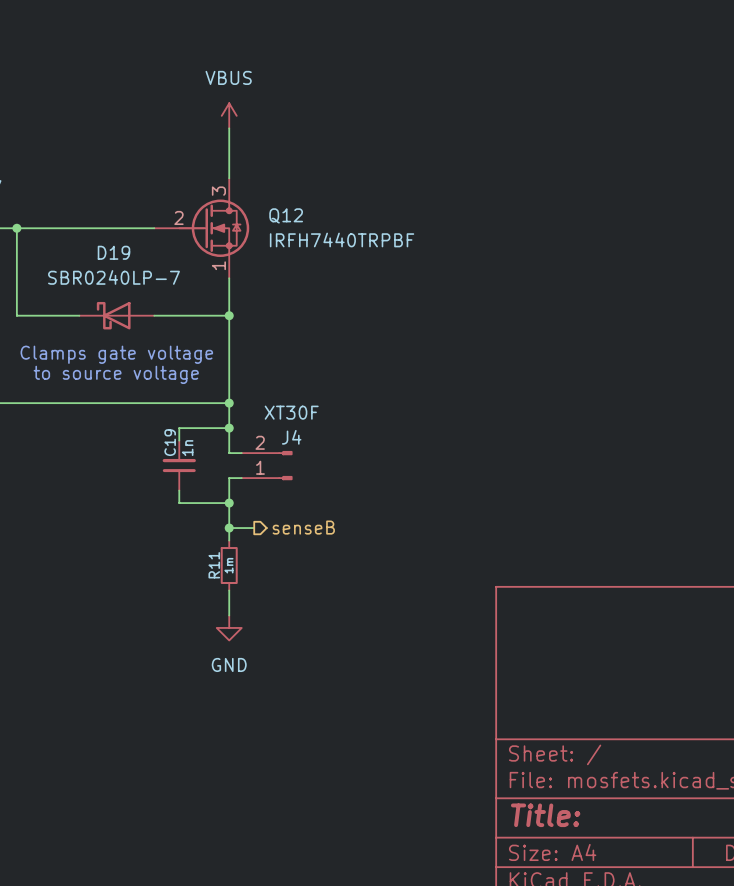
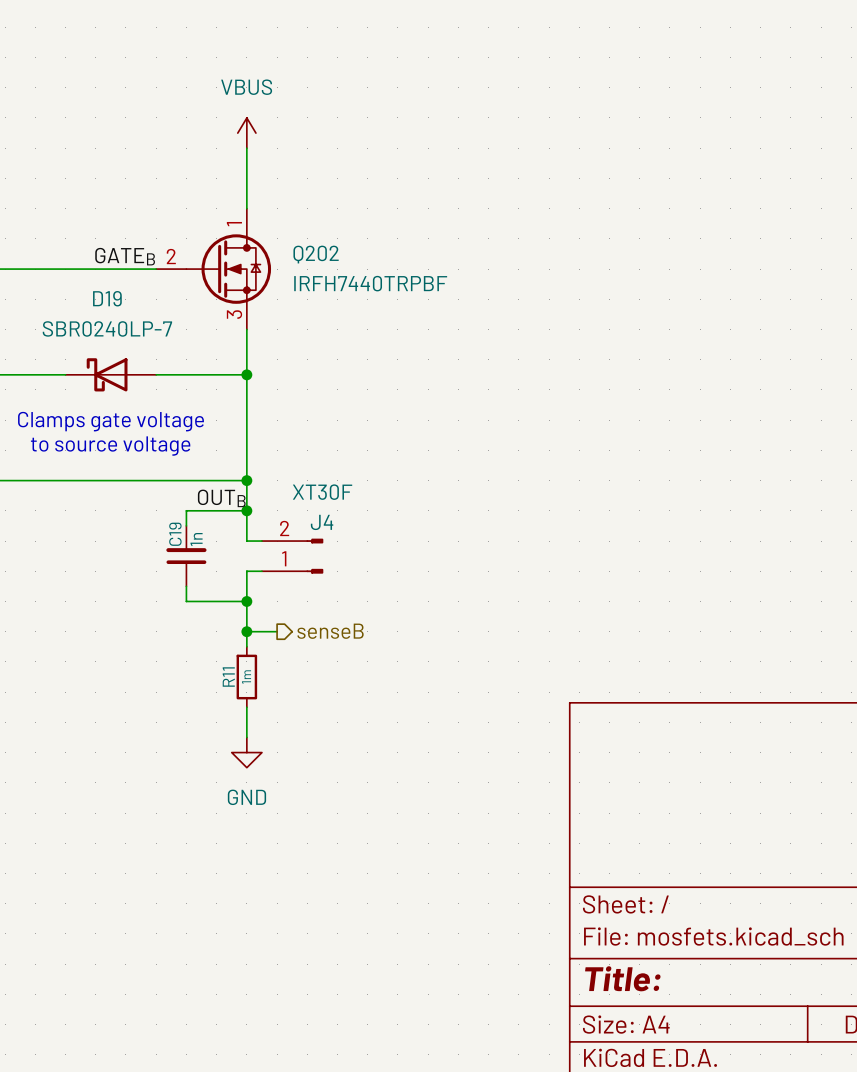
label: none -> GATEB (125, 256)
Q12: IRFH7440TRPBF (201, 228) -> none
Q202: none -> IRFH7440TRPBF (213, 269)
label: none -> OUTB (221, 498)

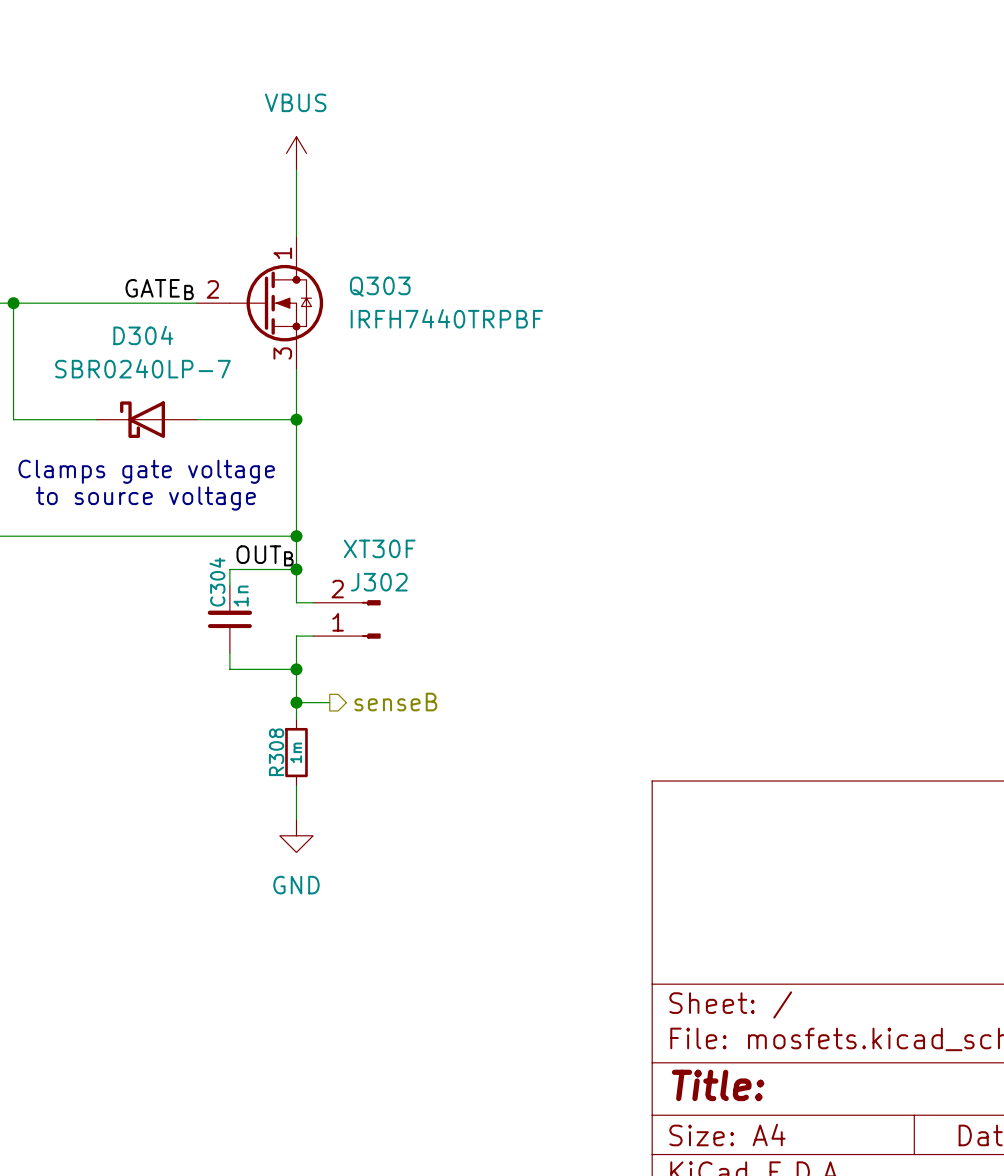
Q202 name: Q202 (316, 254) -> Q303 (380, 286)
D19 name: D19 (107, 298) -> D304 (143, 335)
J4 name: J4 (322, 522) -> J302 (379, 582)
C19 name: C19 (175, 534) -> C304 (217, 582)
R11 name: R11 (228, 677) -> R308 (276, 752)

